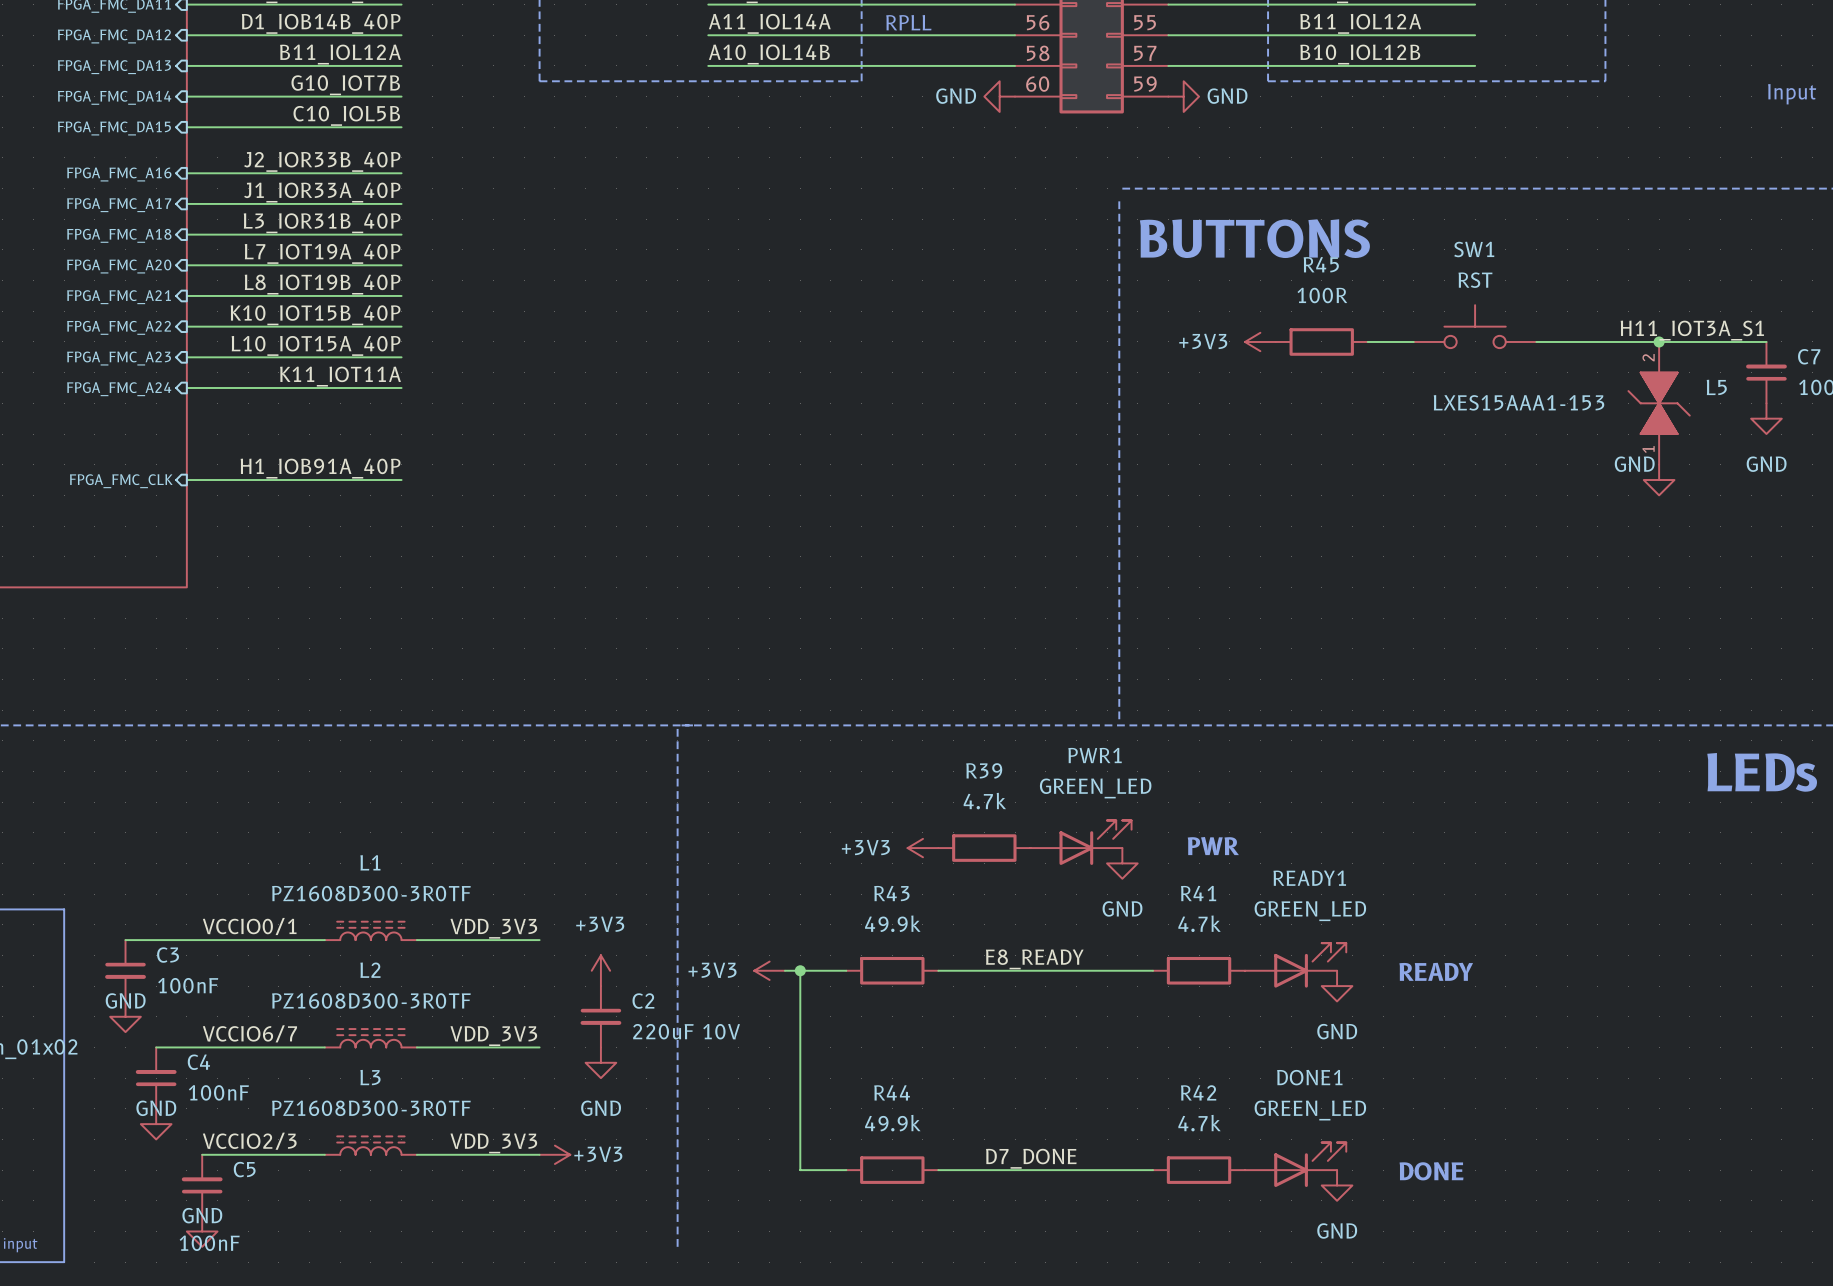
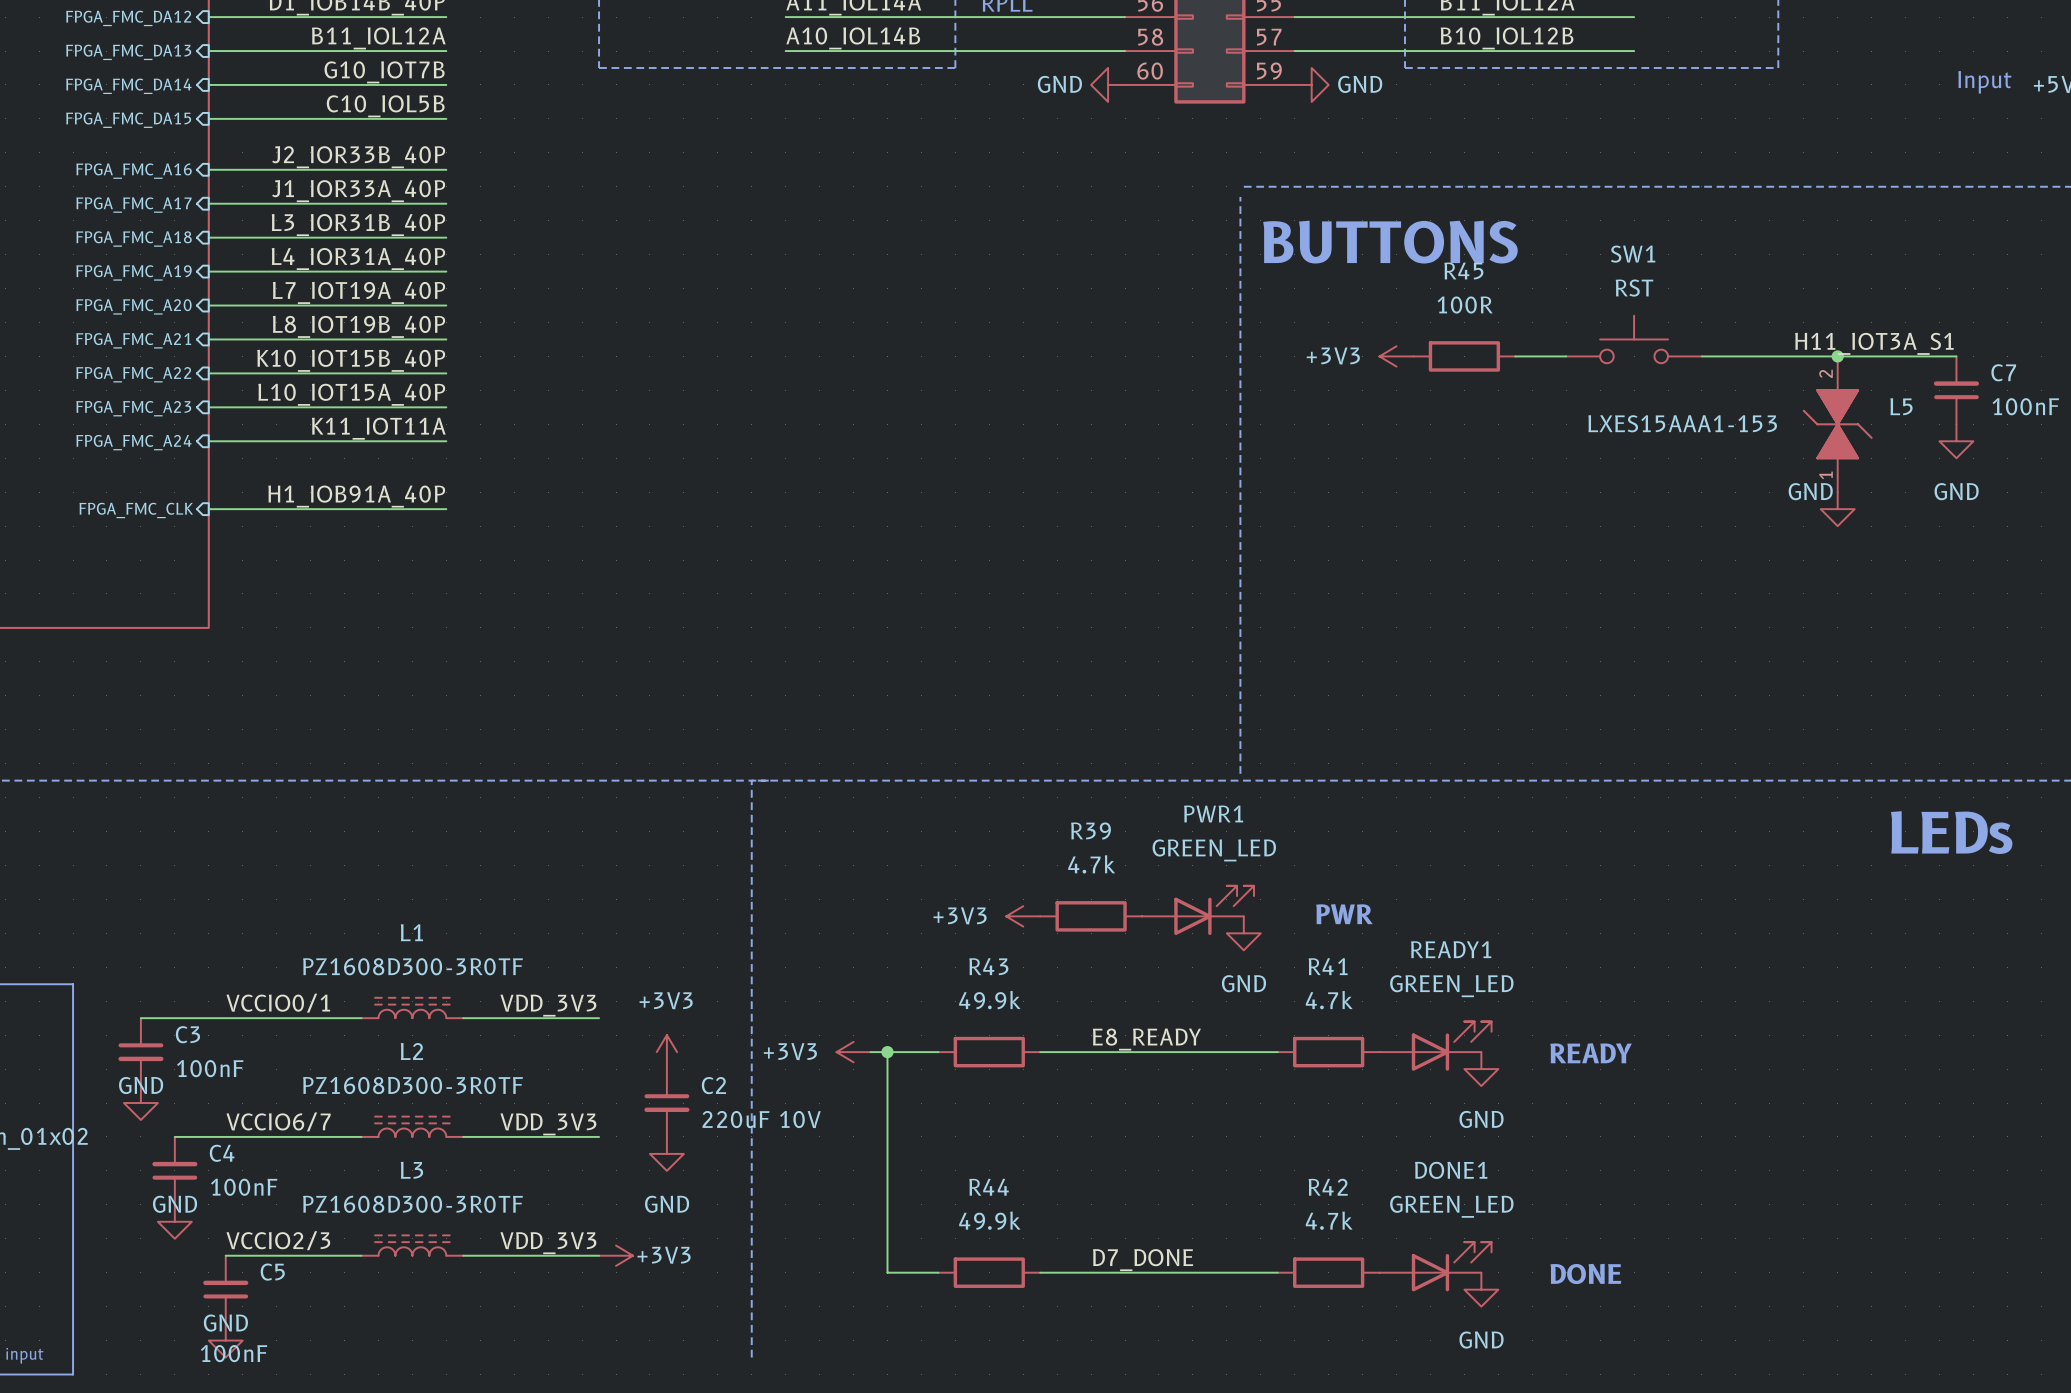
label: L7_IOT19A_40P (322, 253) -> L4_IOR31A_40P (358, 258)
sheet pin: FPGA_FMC_A20 (119, 266) -> FPGA_FMC_A19 (134, 272)
label: L8_IOT19B_40P (322, 284) -> L7_IOT19A_40P (358, 292)
sheet pin: FPGA_FMC_A21 (119, 297) -> FPGA_FMC_A20 (133, 306)
label: K10_IOT15B_40P (315, 315) -> L8_IOT19B_40P (358, 326)
sheet pin: FPGA_FMC_A22 (119, 327) -> FPGA_FMC_A21 (133, 340)
label: L10_IOT15A_40P (316, 345) -> K10_IOT15B_40P (351, 360)
sheet pin: FPGA_FMC_A23 (119, 358) -> FPGA_FMC_A22 (133, 374)
label: K11_IOT11A (340, 376) -> L10_IOT15A_40P (351, 394)
sheet pin: FPGA_FMC_A24 (119, 389) -> FPGA_FMC_A23 (133, 408)
label: none -> K11_IOT11A (378, 428)
wire: none -> (208, 441) (446, 441)
sheet pin: none -> FPGA_FMC_A24 (133, 442)

